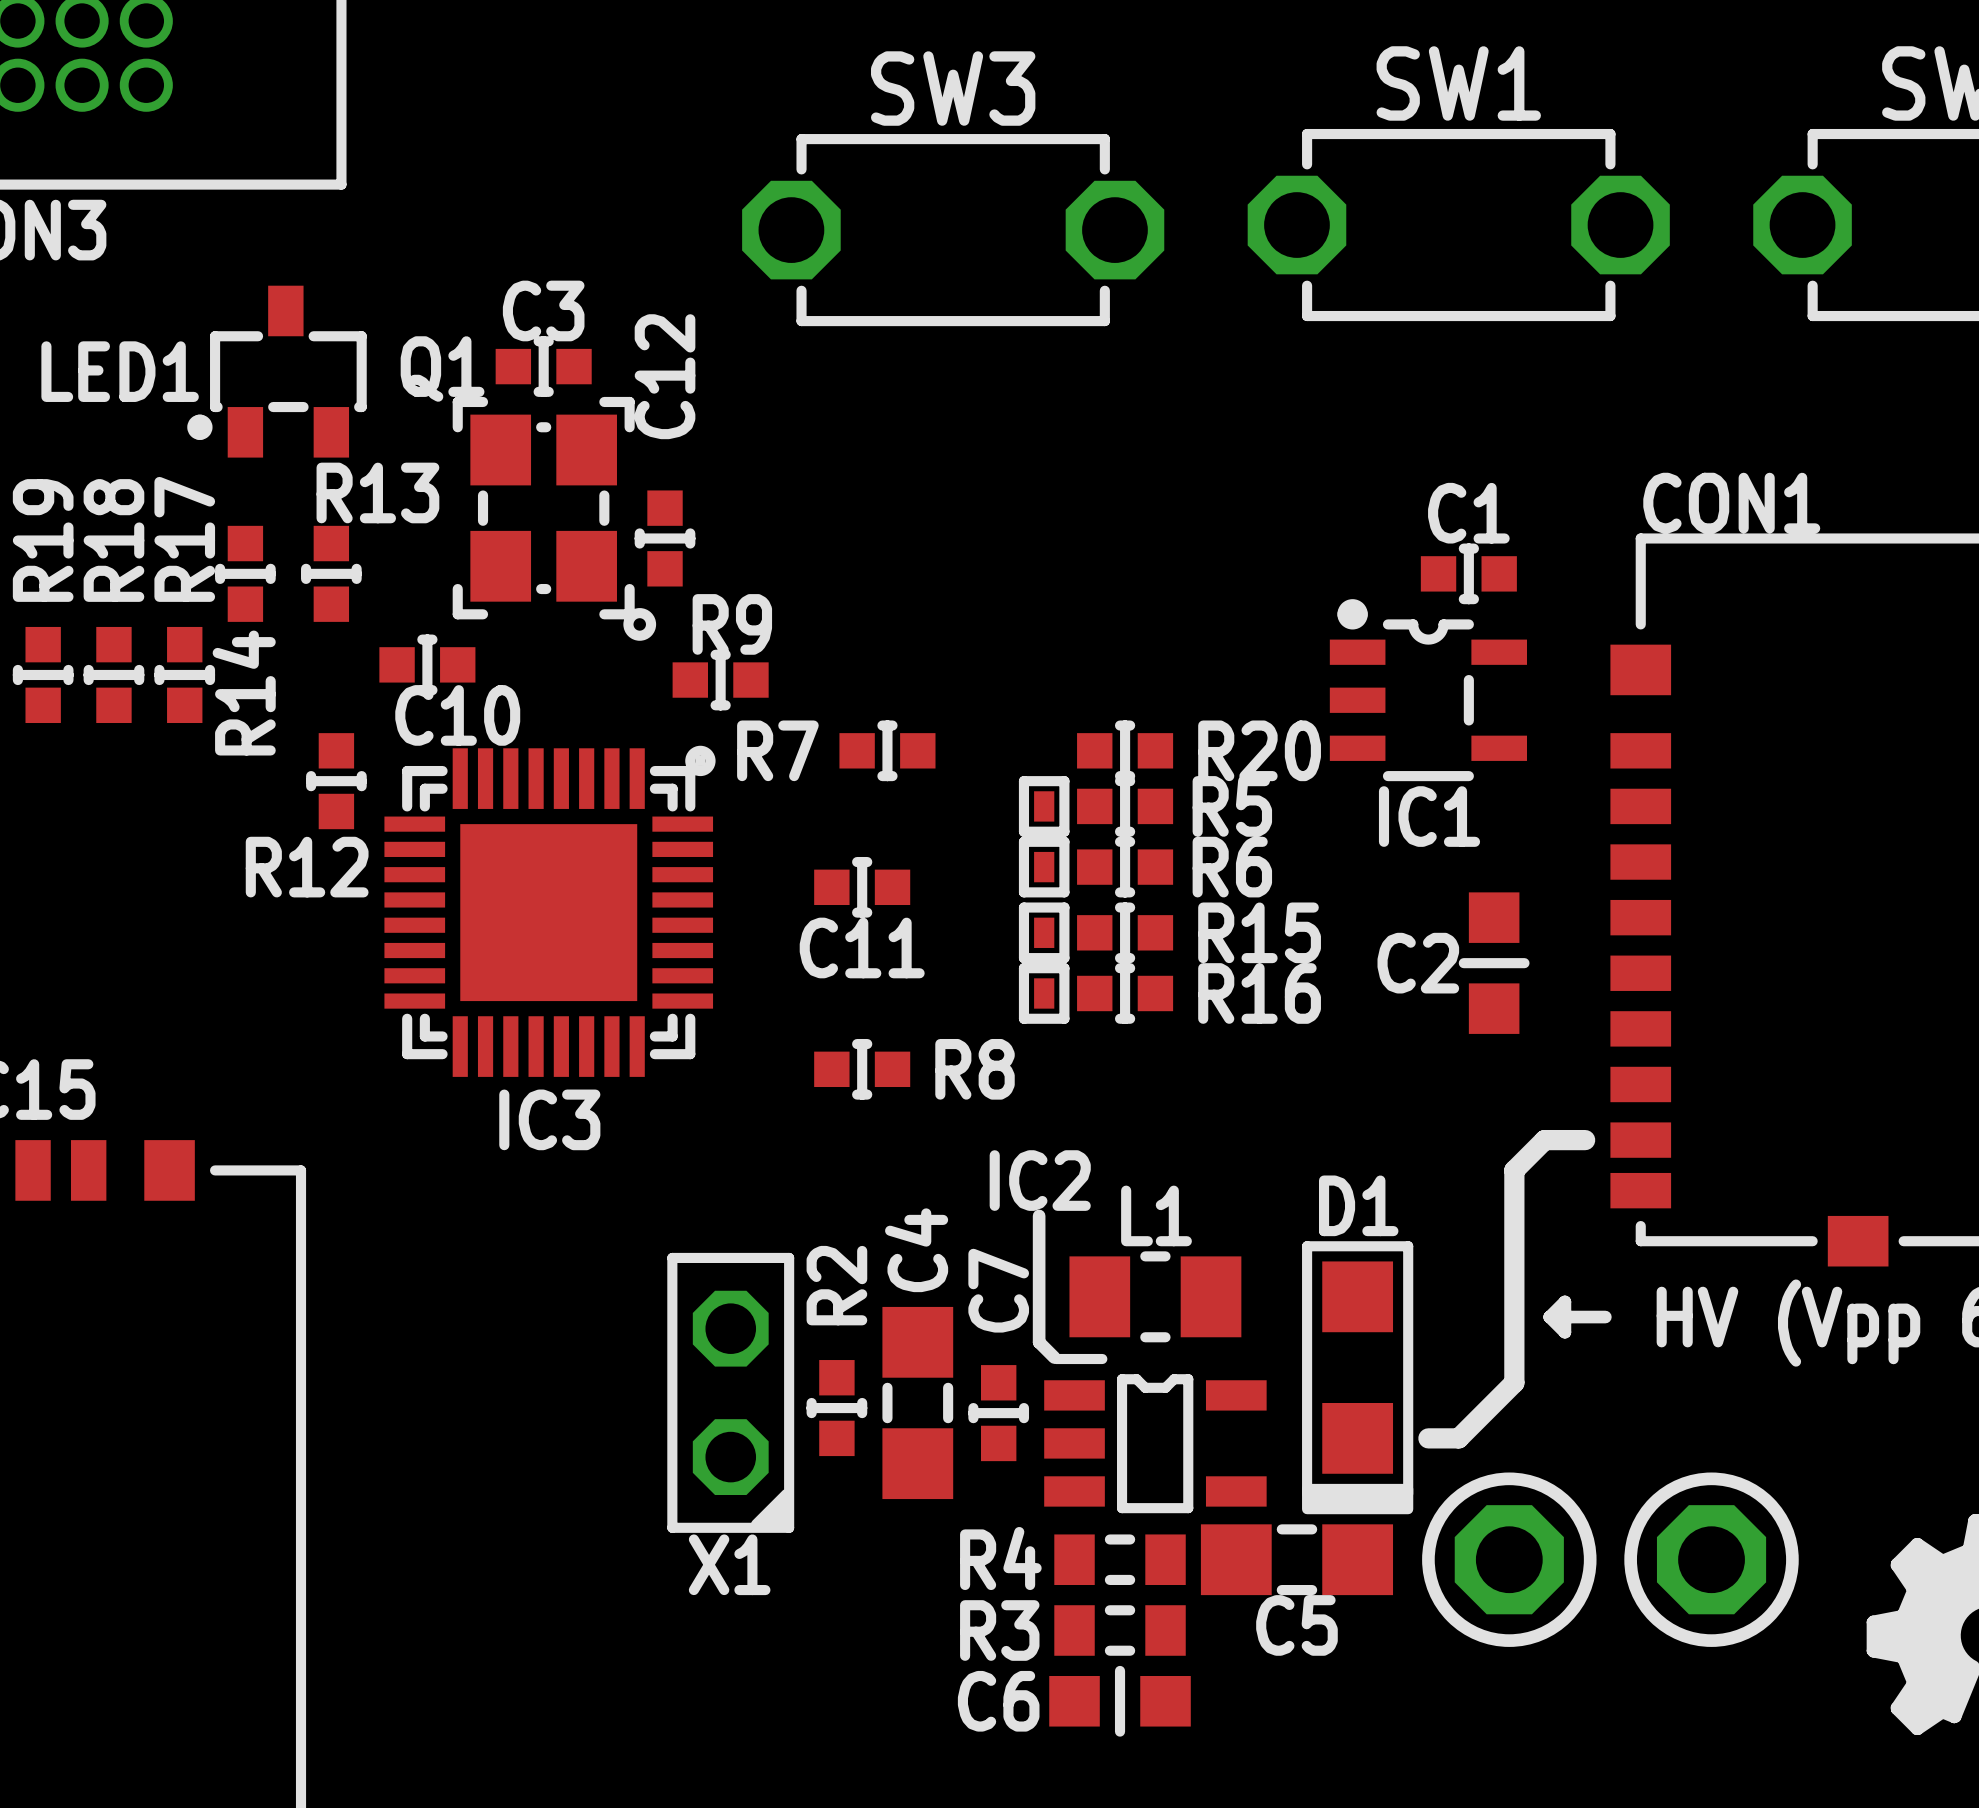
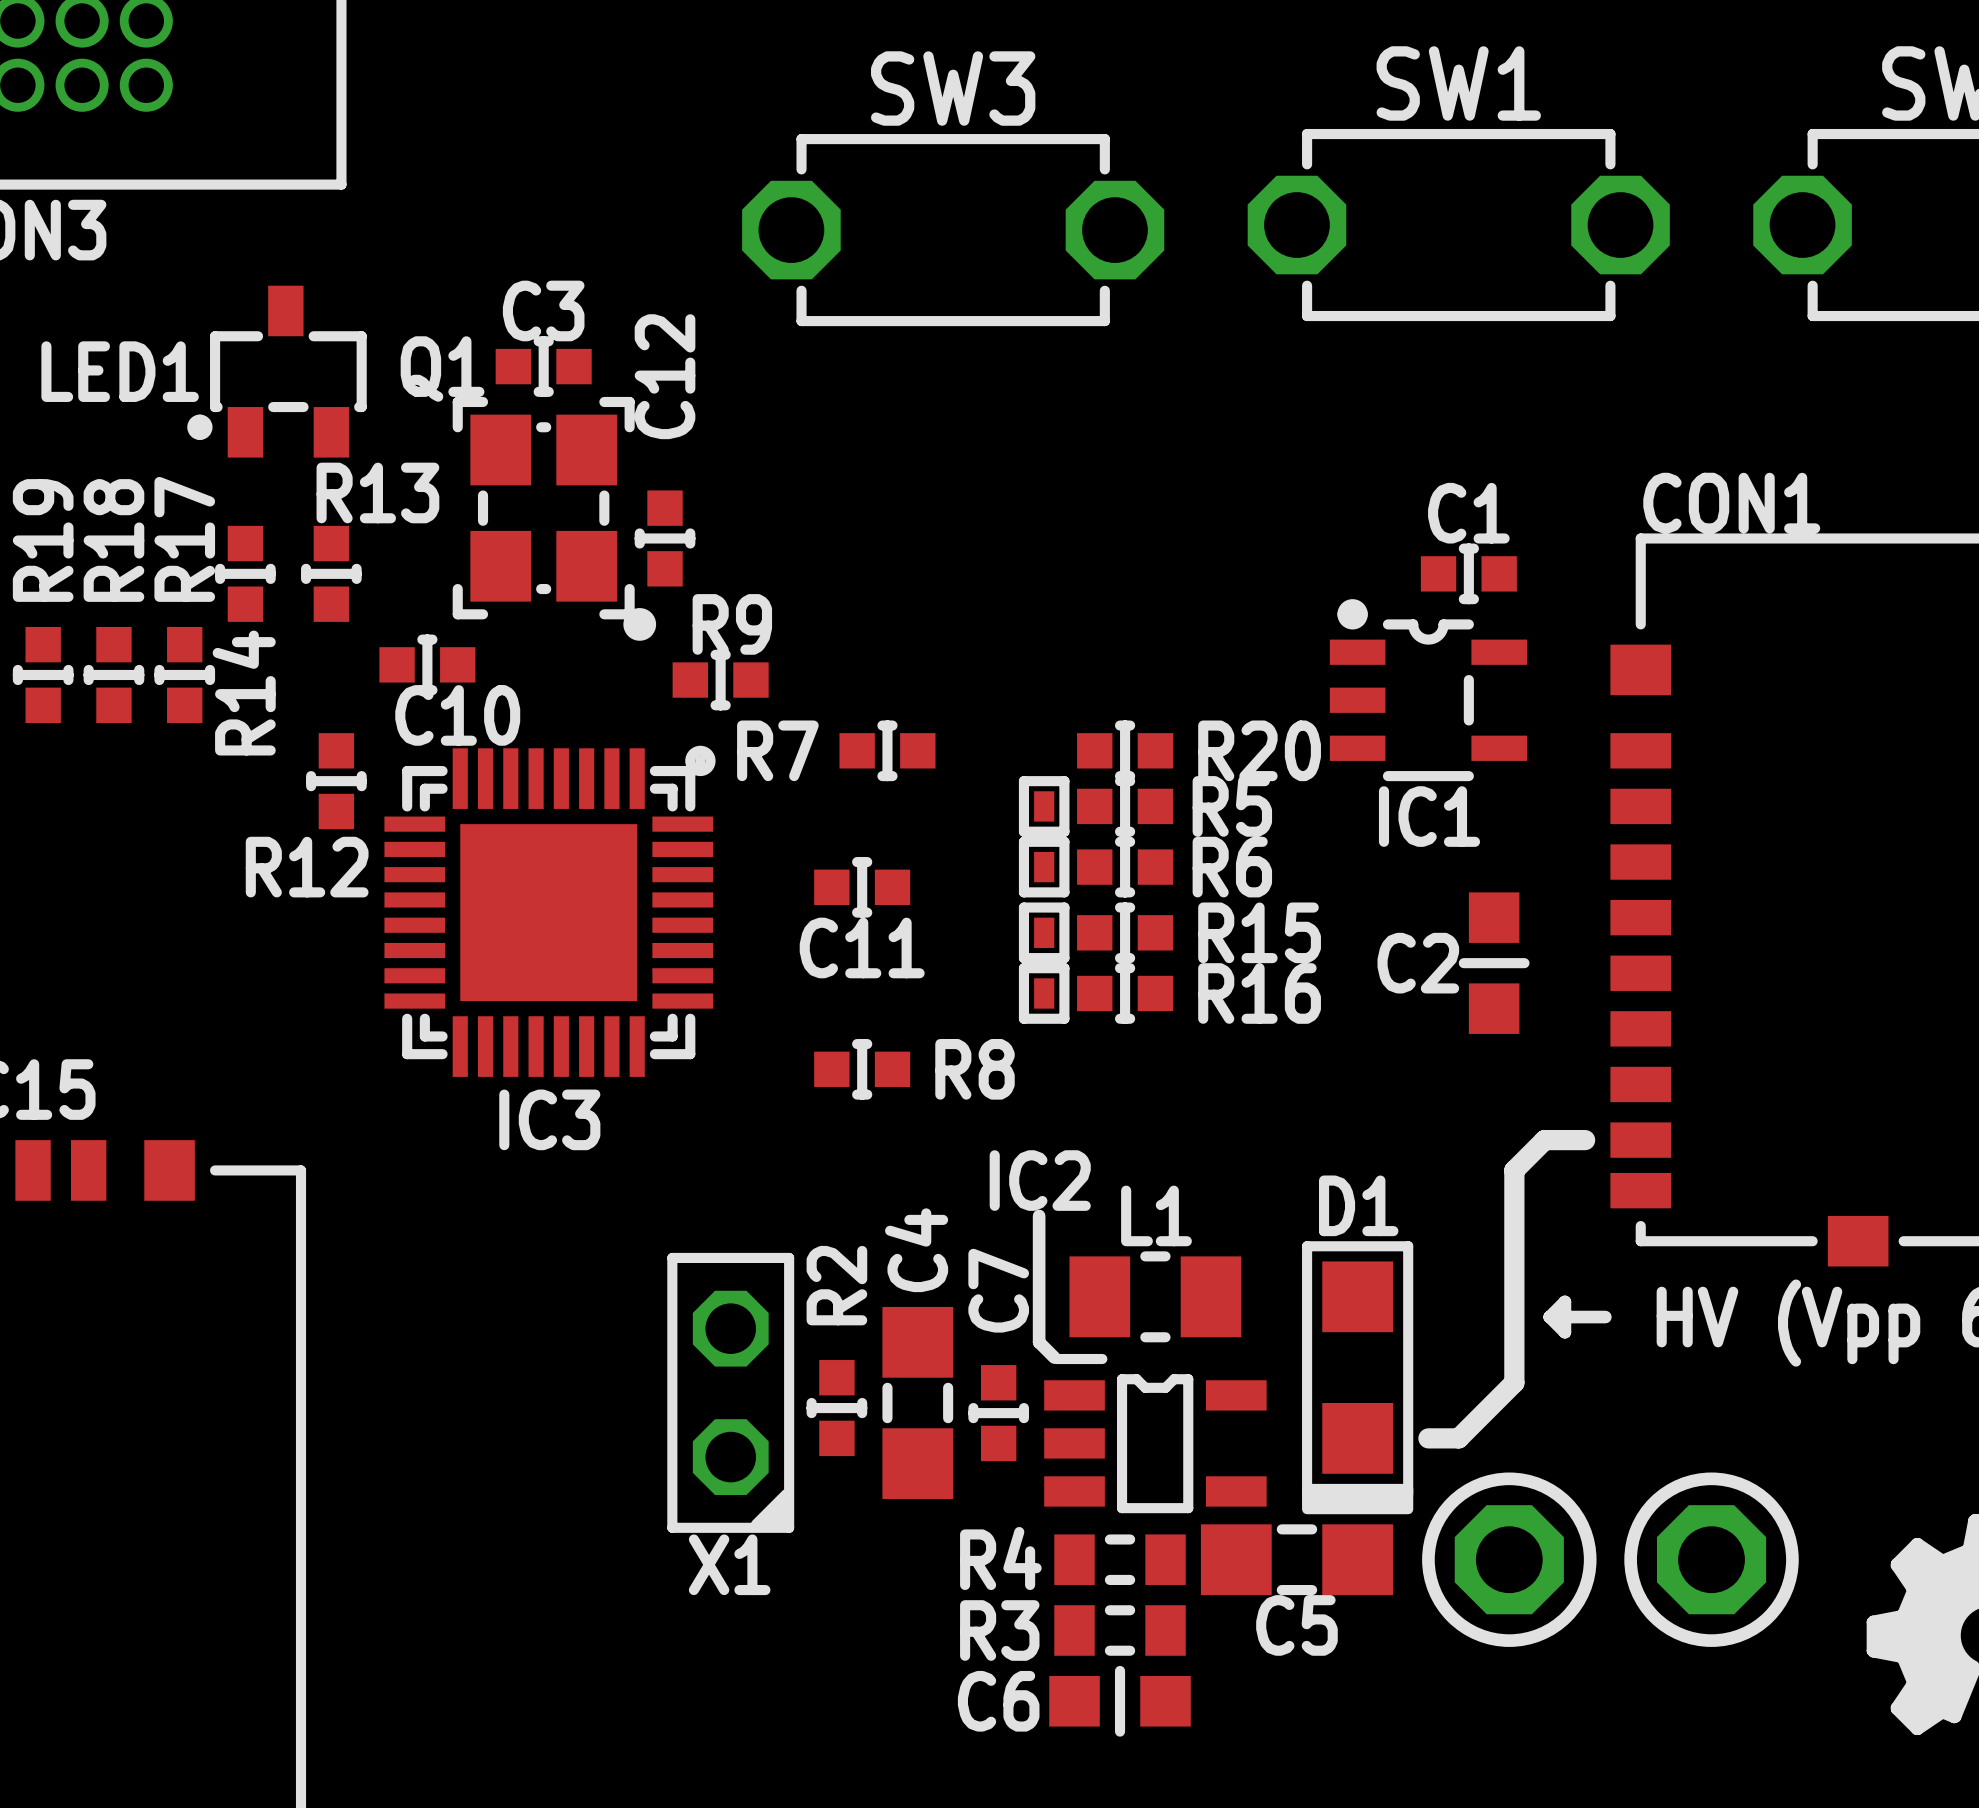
Q1 footprint: [452, 396, 657, 641] -> [452, 396, 657, 641]

